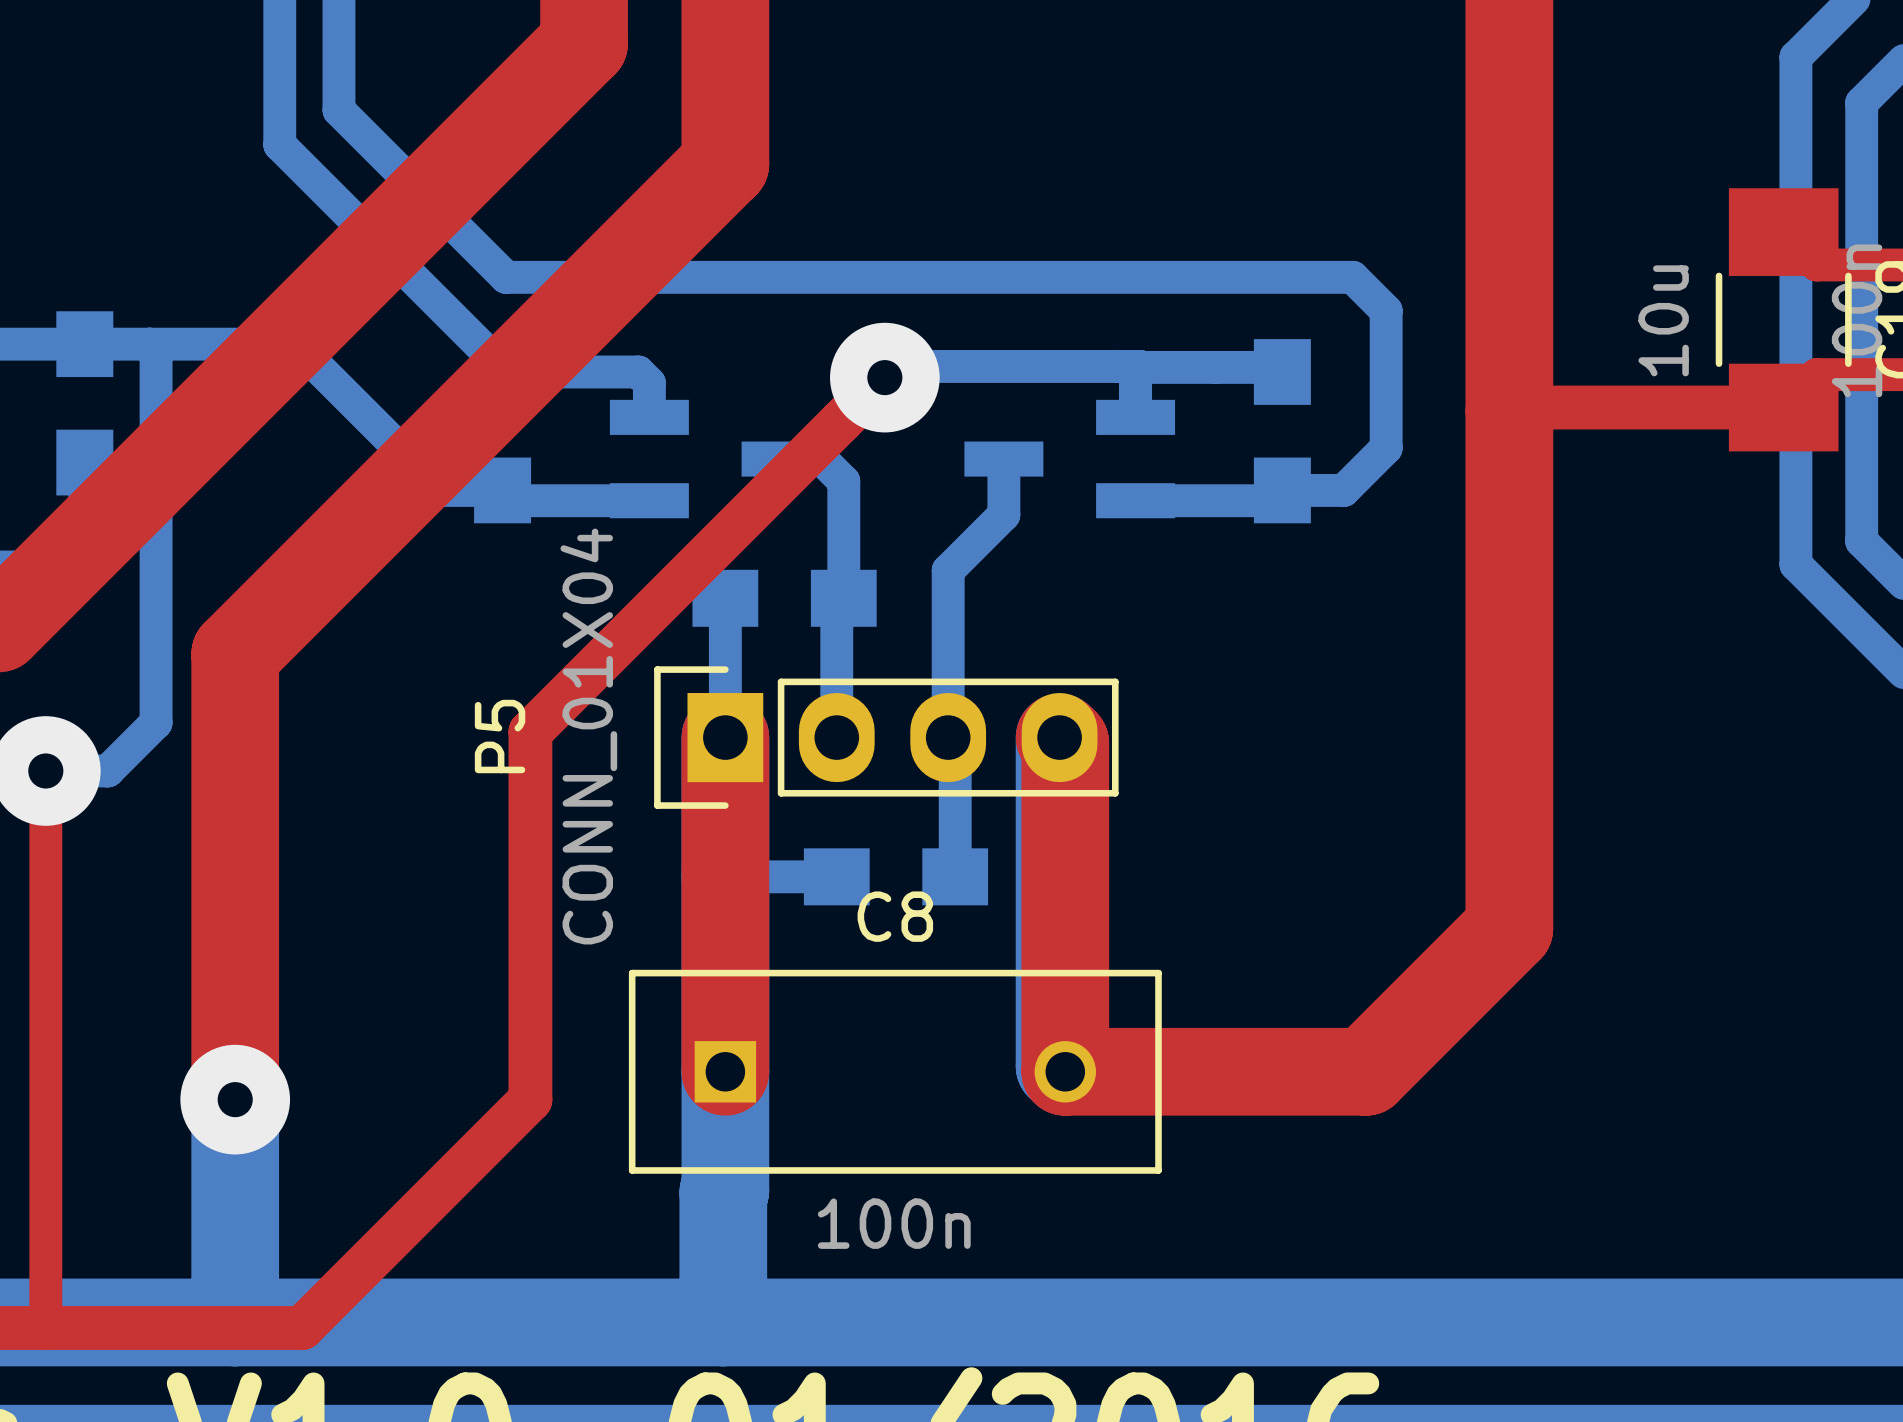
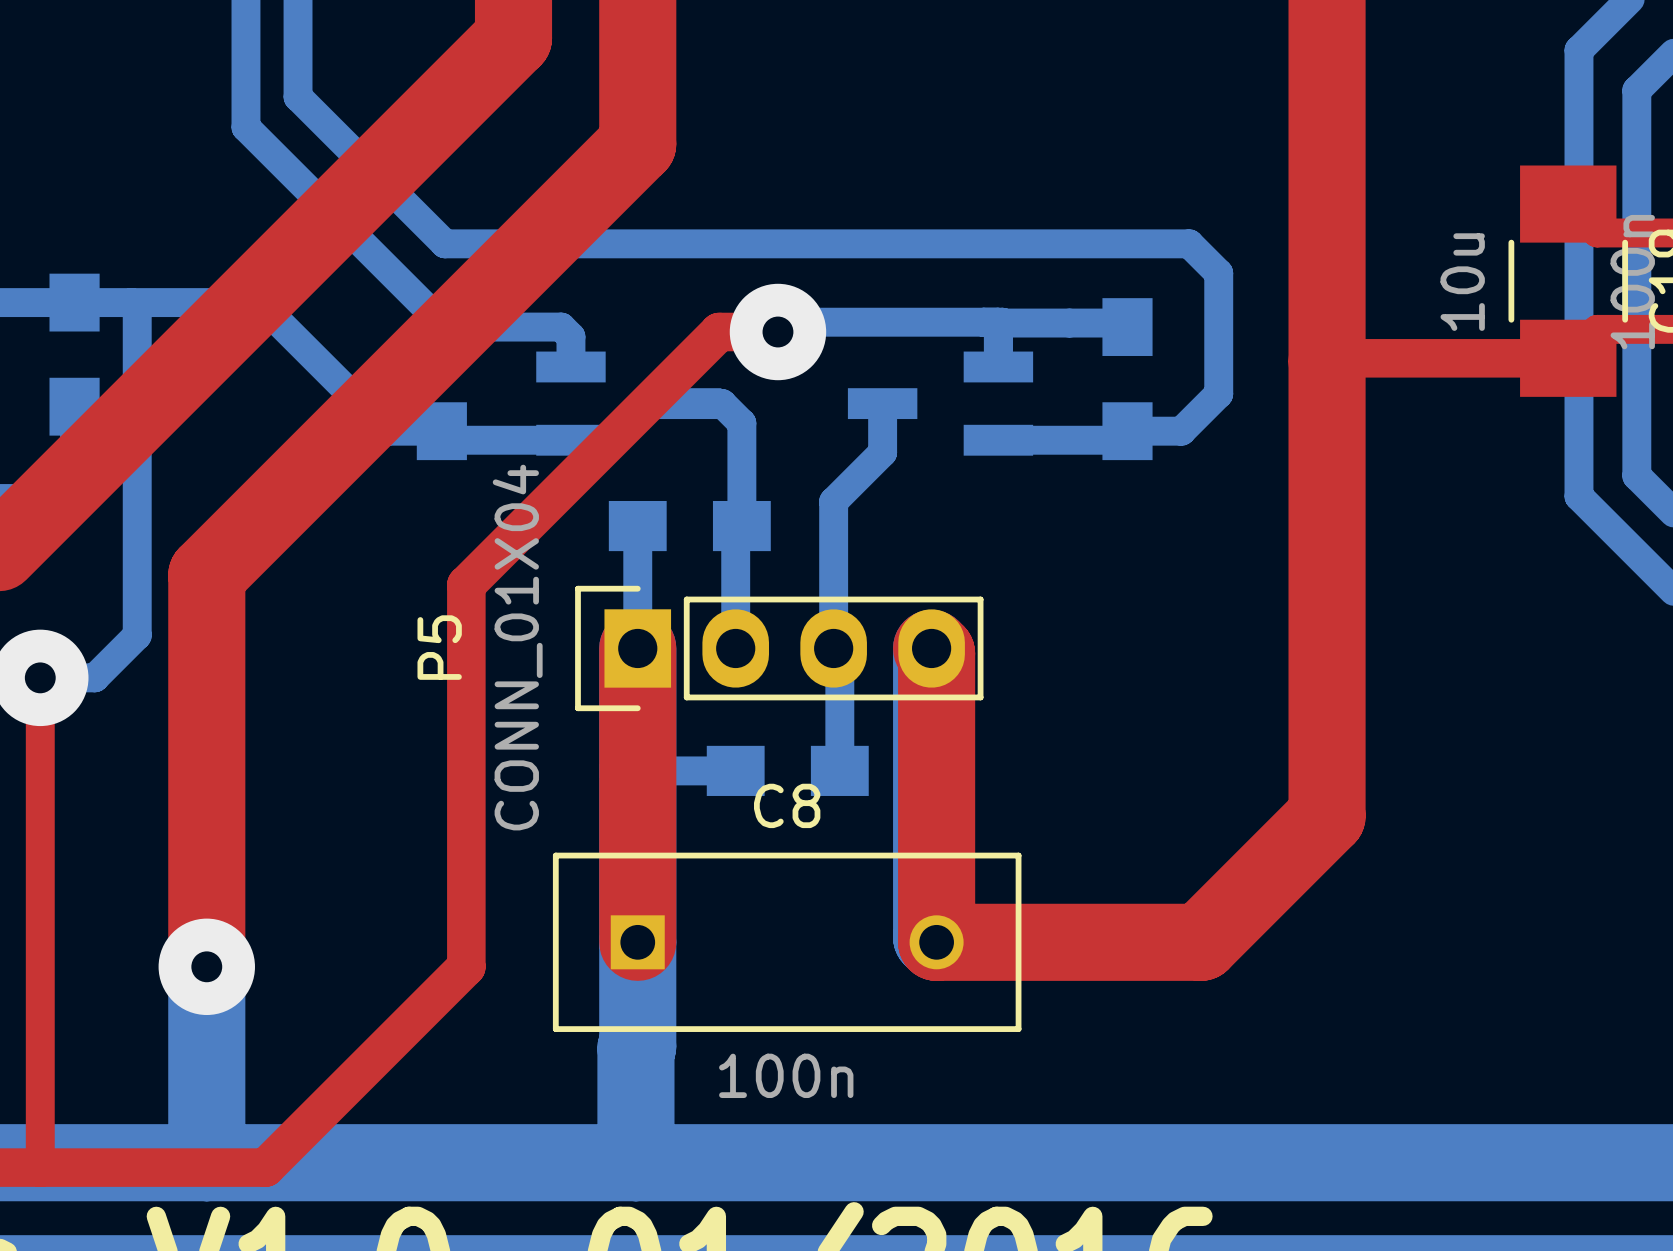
top track: (884, 377) (530, 732) -> (777, 332) (719, 332) (466, 584) (466, 643)

